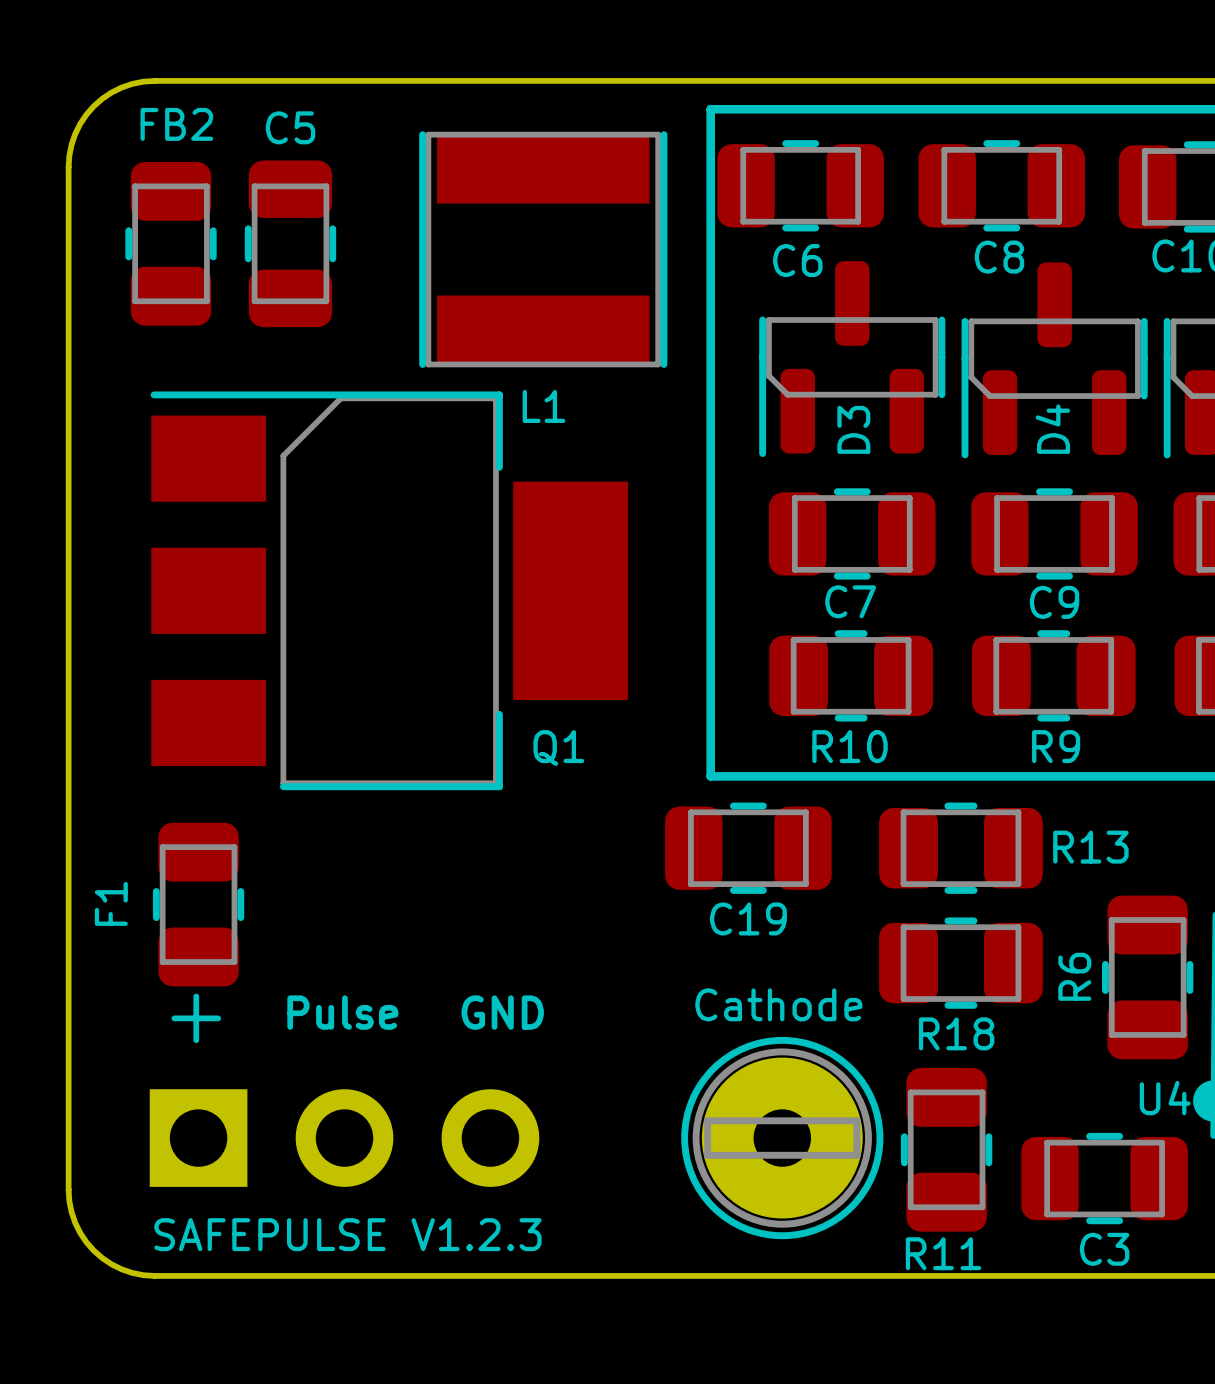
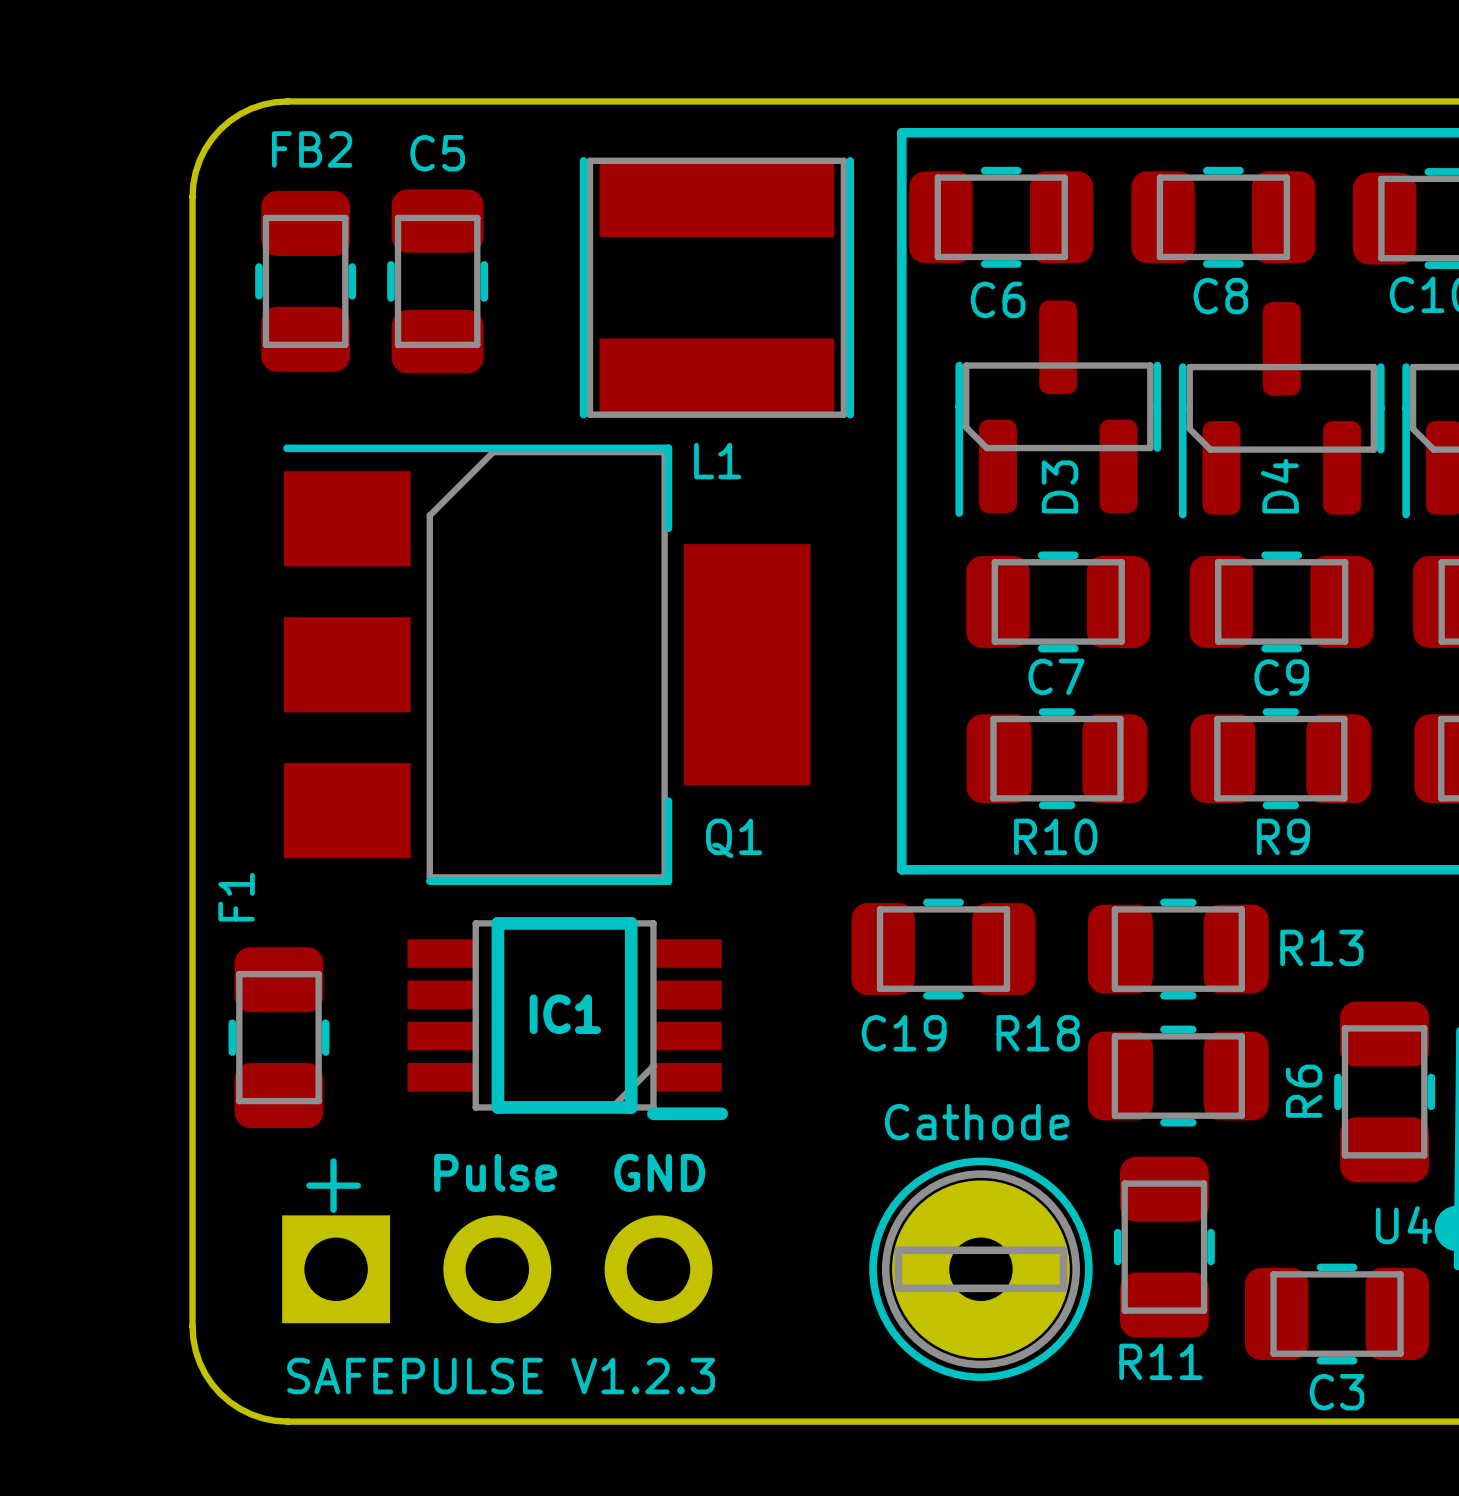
F1 name position: F1 (111, 903) -> F1 (236, 897)
F1 position: (198, 904) -> (278, 1037)
IC1: none -> (567, 1018)
C19 name position: C19 (748, 918) -> C19 (904, 1033)
text position: Pulse (342, 1012) -> Pulse (495, 1172)
text position: GND (502, 1012) -> GND (659, 1172)
text position: + (196, 1018) -> + (333, 1185)
R18 name position: R18 (956, 1033) -> R18 (1038, 1033)
R11 position: (946, 1149) -> (1164, 1247)

